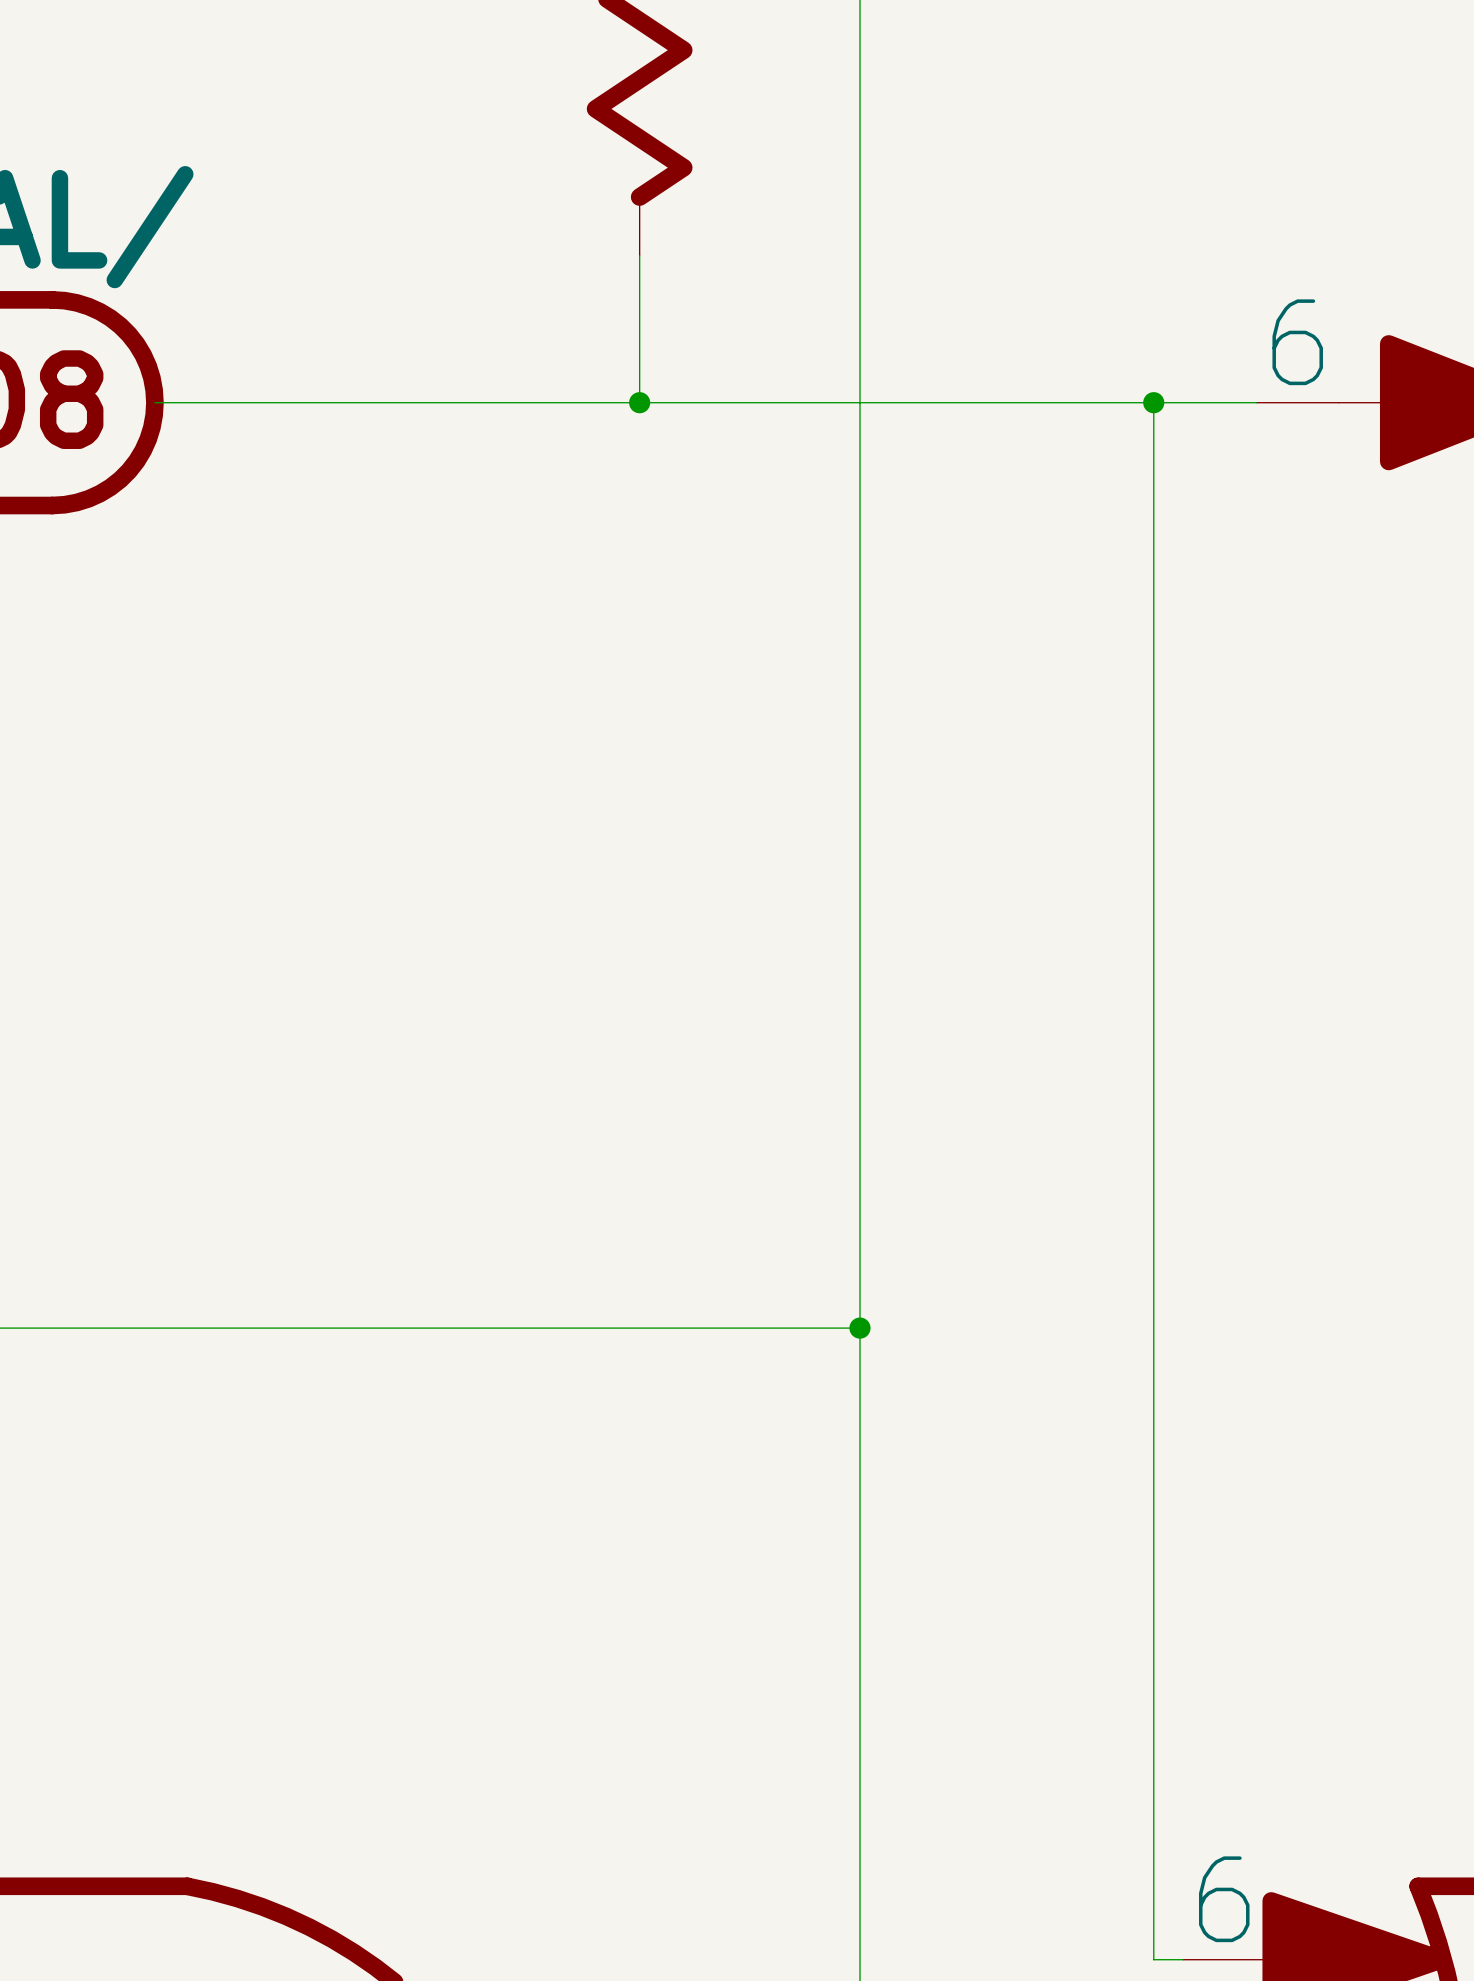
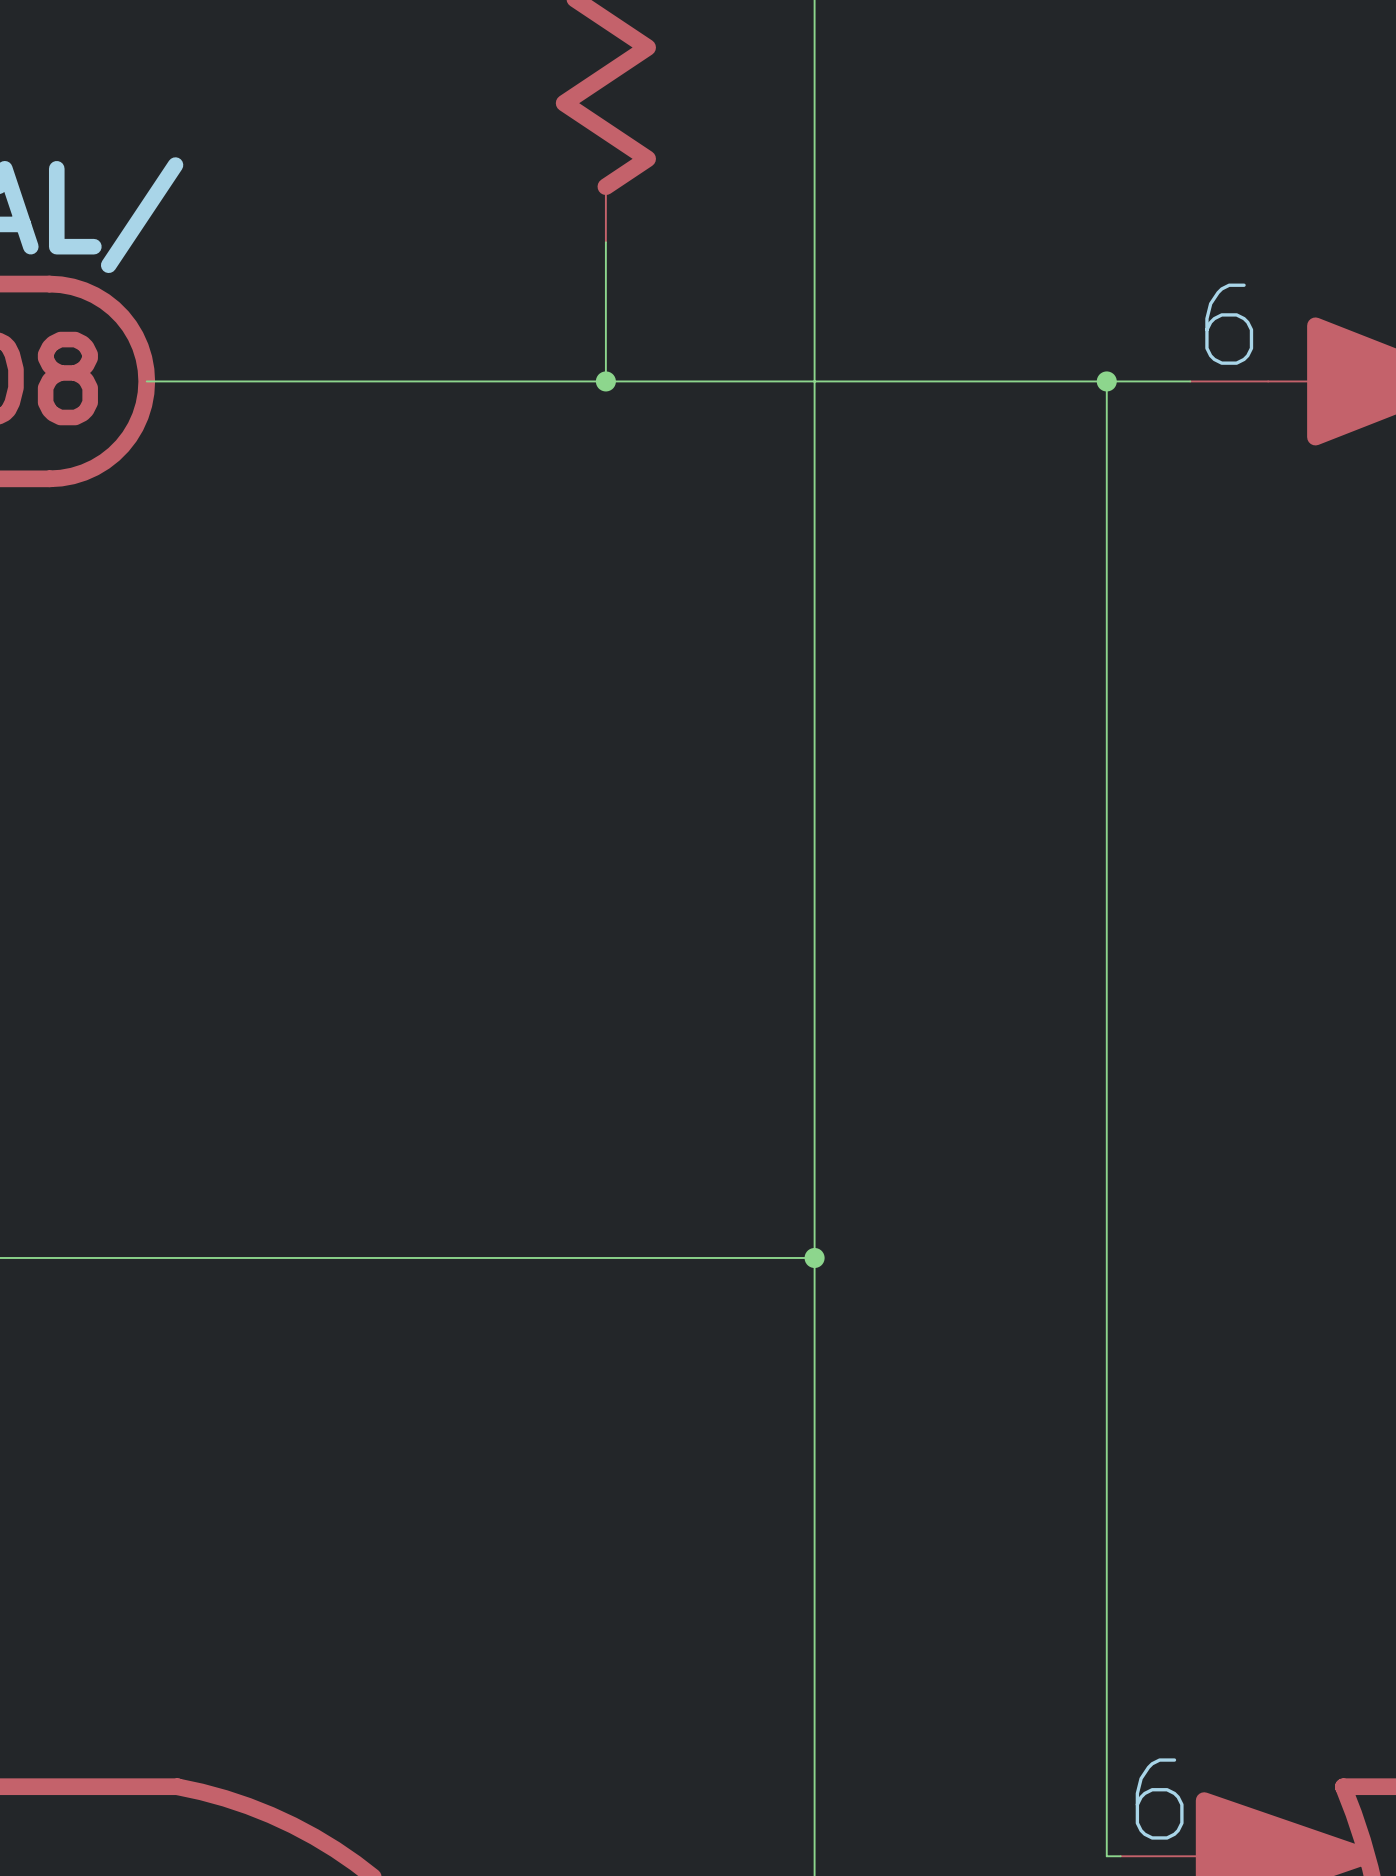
wire: (1153, 402) (1153, 1959) (1168, 1959) -> (1106, 381) (1106, 1856)
junction position: (1153, 402) -> (1106, 381)

